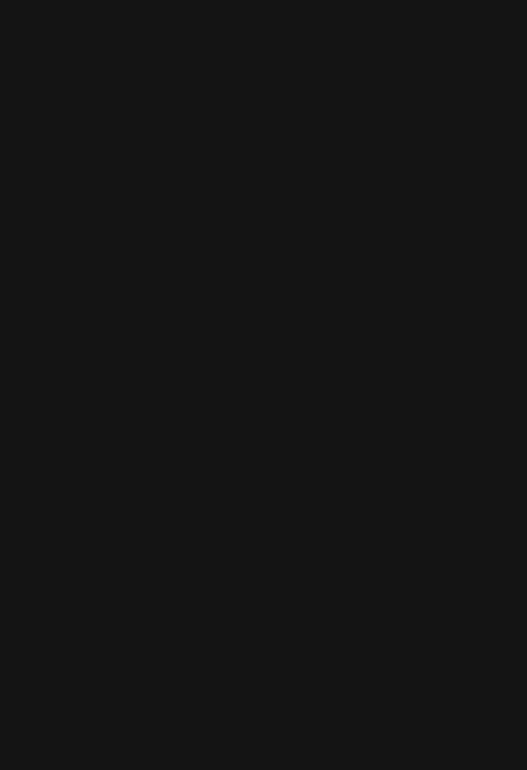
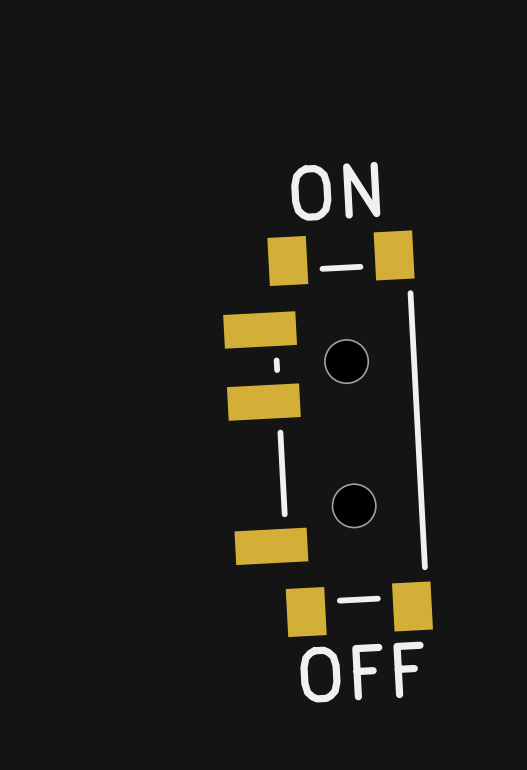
part: none -> (328, 433)

